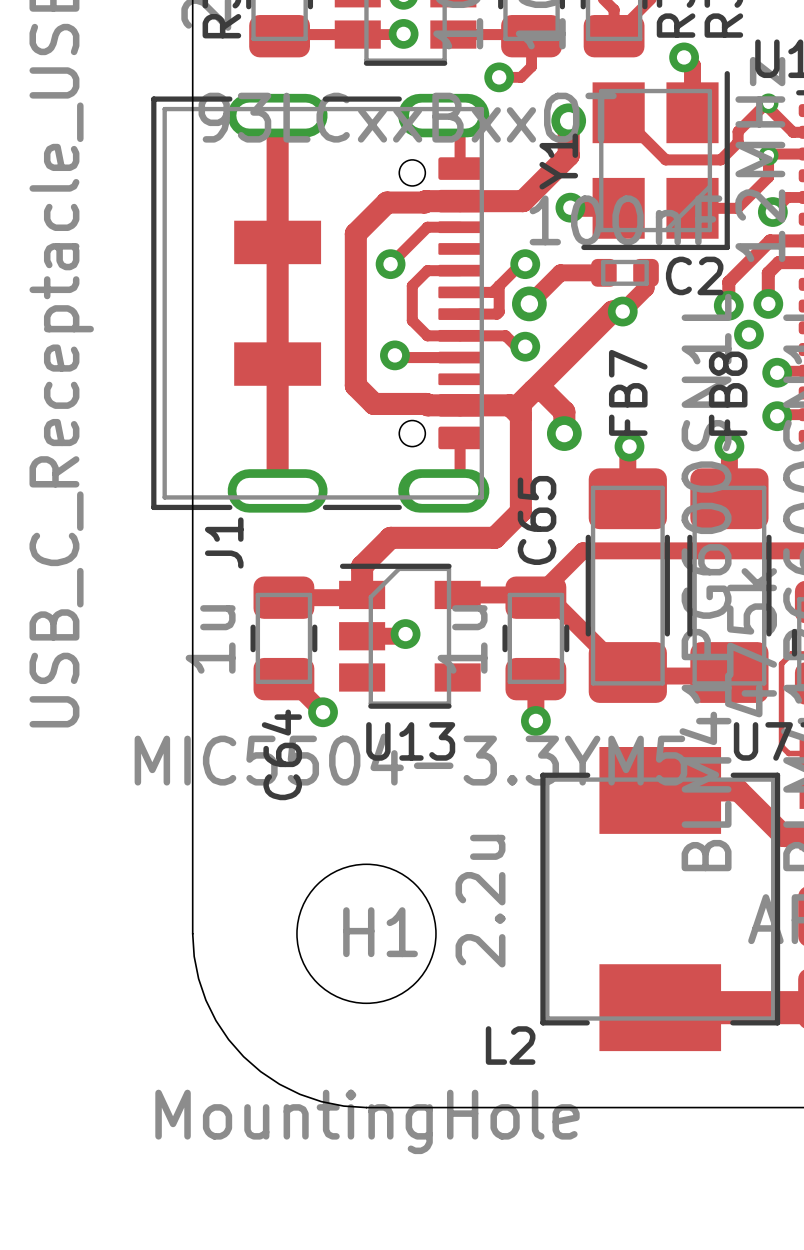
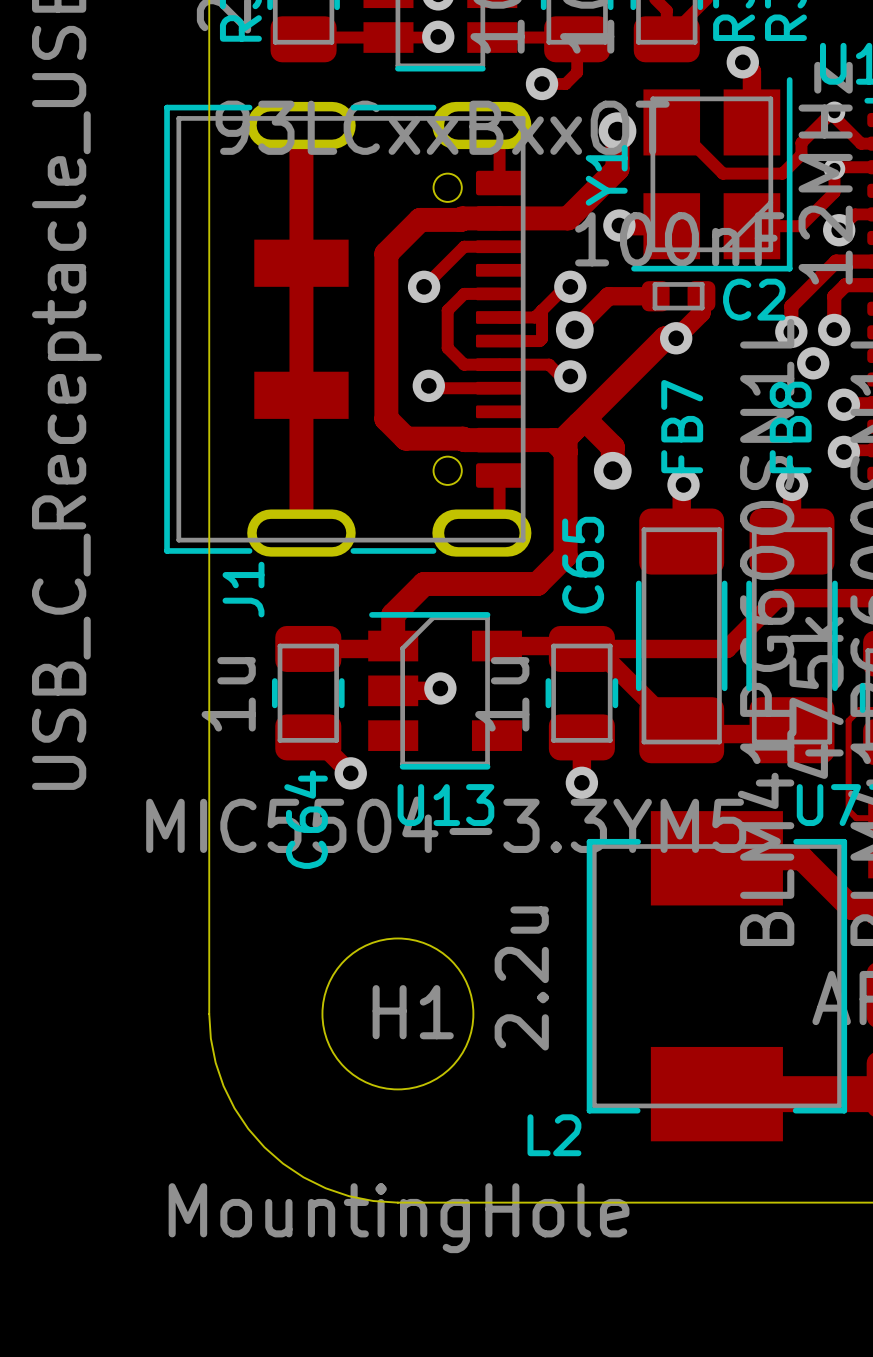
track: (716, 550) (582, 550) (535, 597) -> (777, 598) (727, 648) (596, 648)

